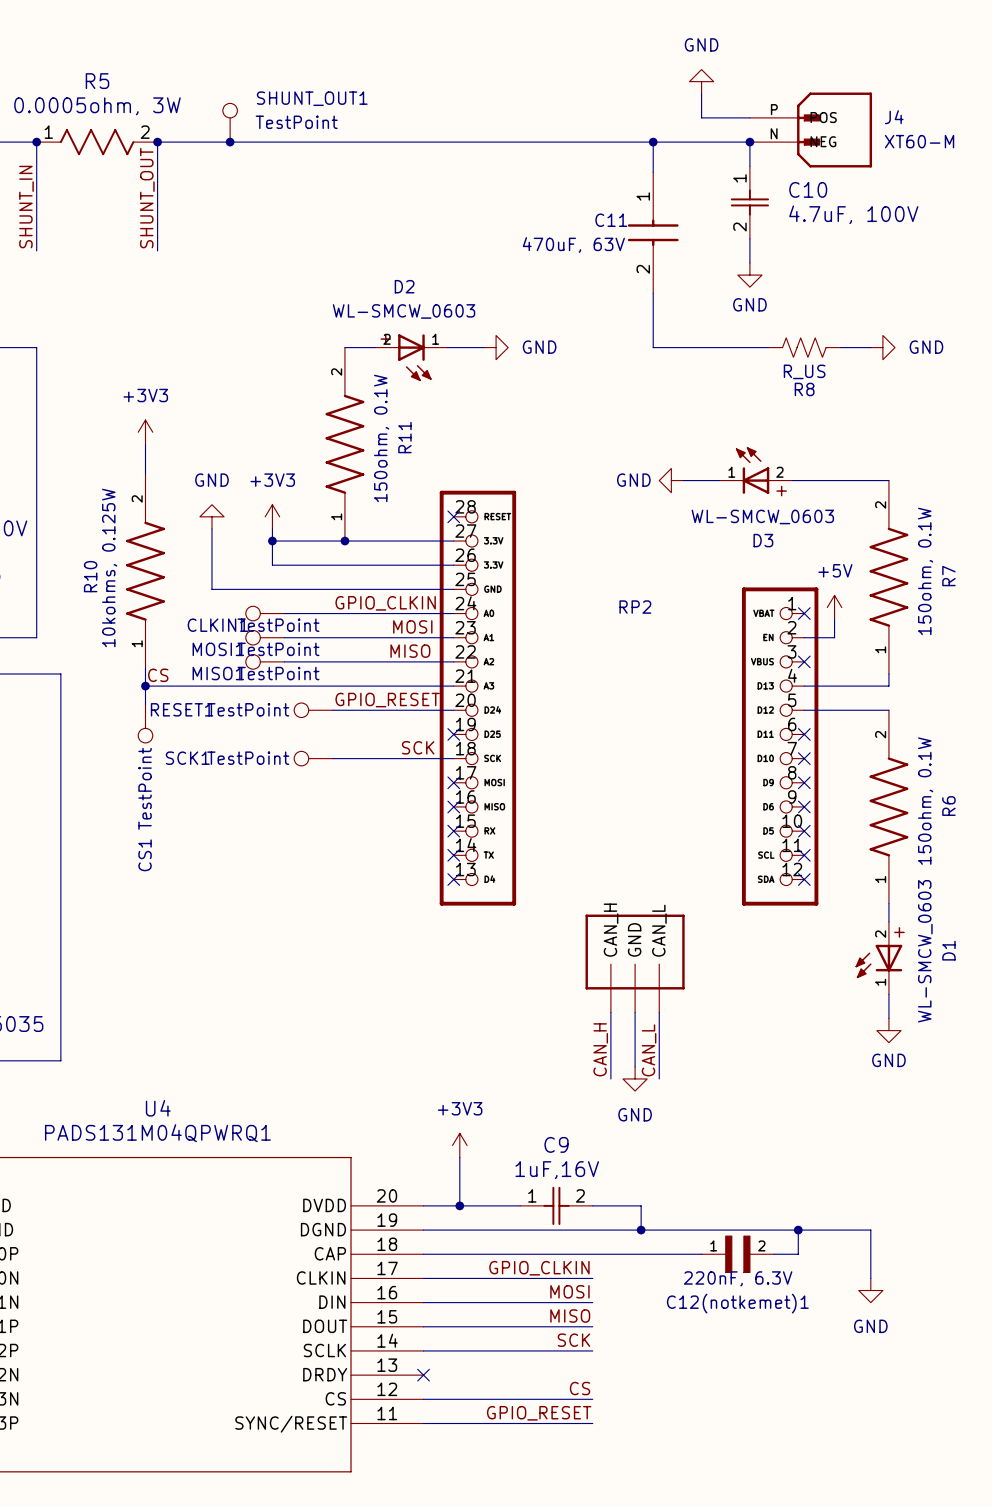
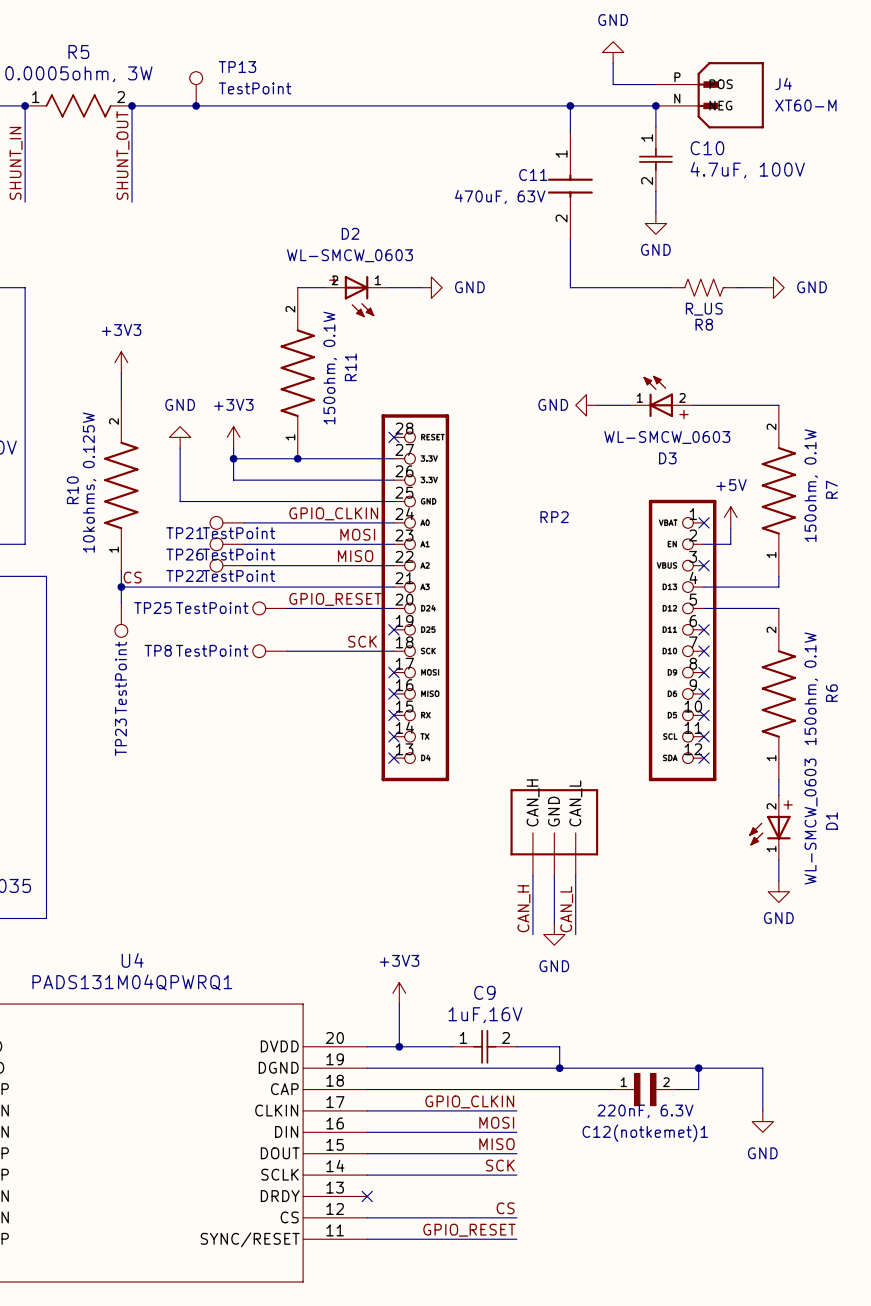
SHUNT_OUT1 name: SHUNT_OUT1 (312, 98) -> TP13 (237, 67)
CLKIN1 name: CLKIN1 (218, 625) -> TP21 (184, 533)
MOSI1 name: MOSI1 (218, 649) -> TP26 (184, 554)
MISO1 name: MISO1 (218, 673) -> TP22 (184, 575)
RESET1 name: RESET1 (182, 709) -> TP25 (152, 608)
SCK1 name: SCK1 (187, 758) -> TP8 (158, 650)
CS1 name: CS1 (145, 855) -> TP23 (120, 737)

